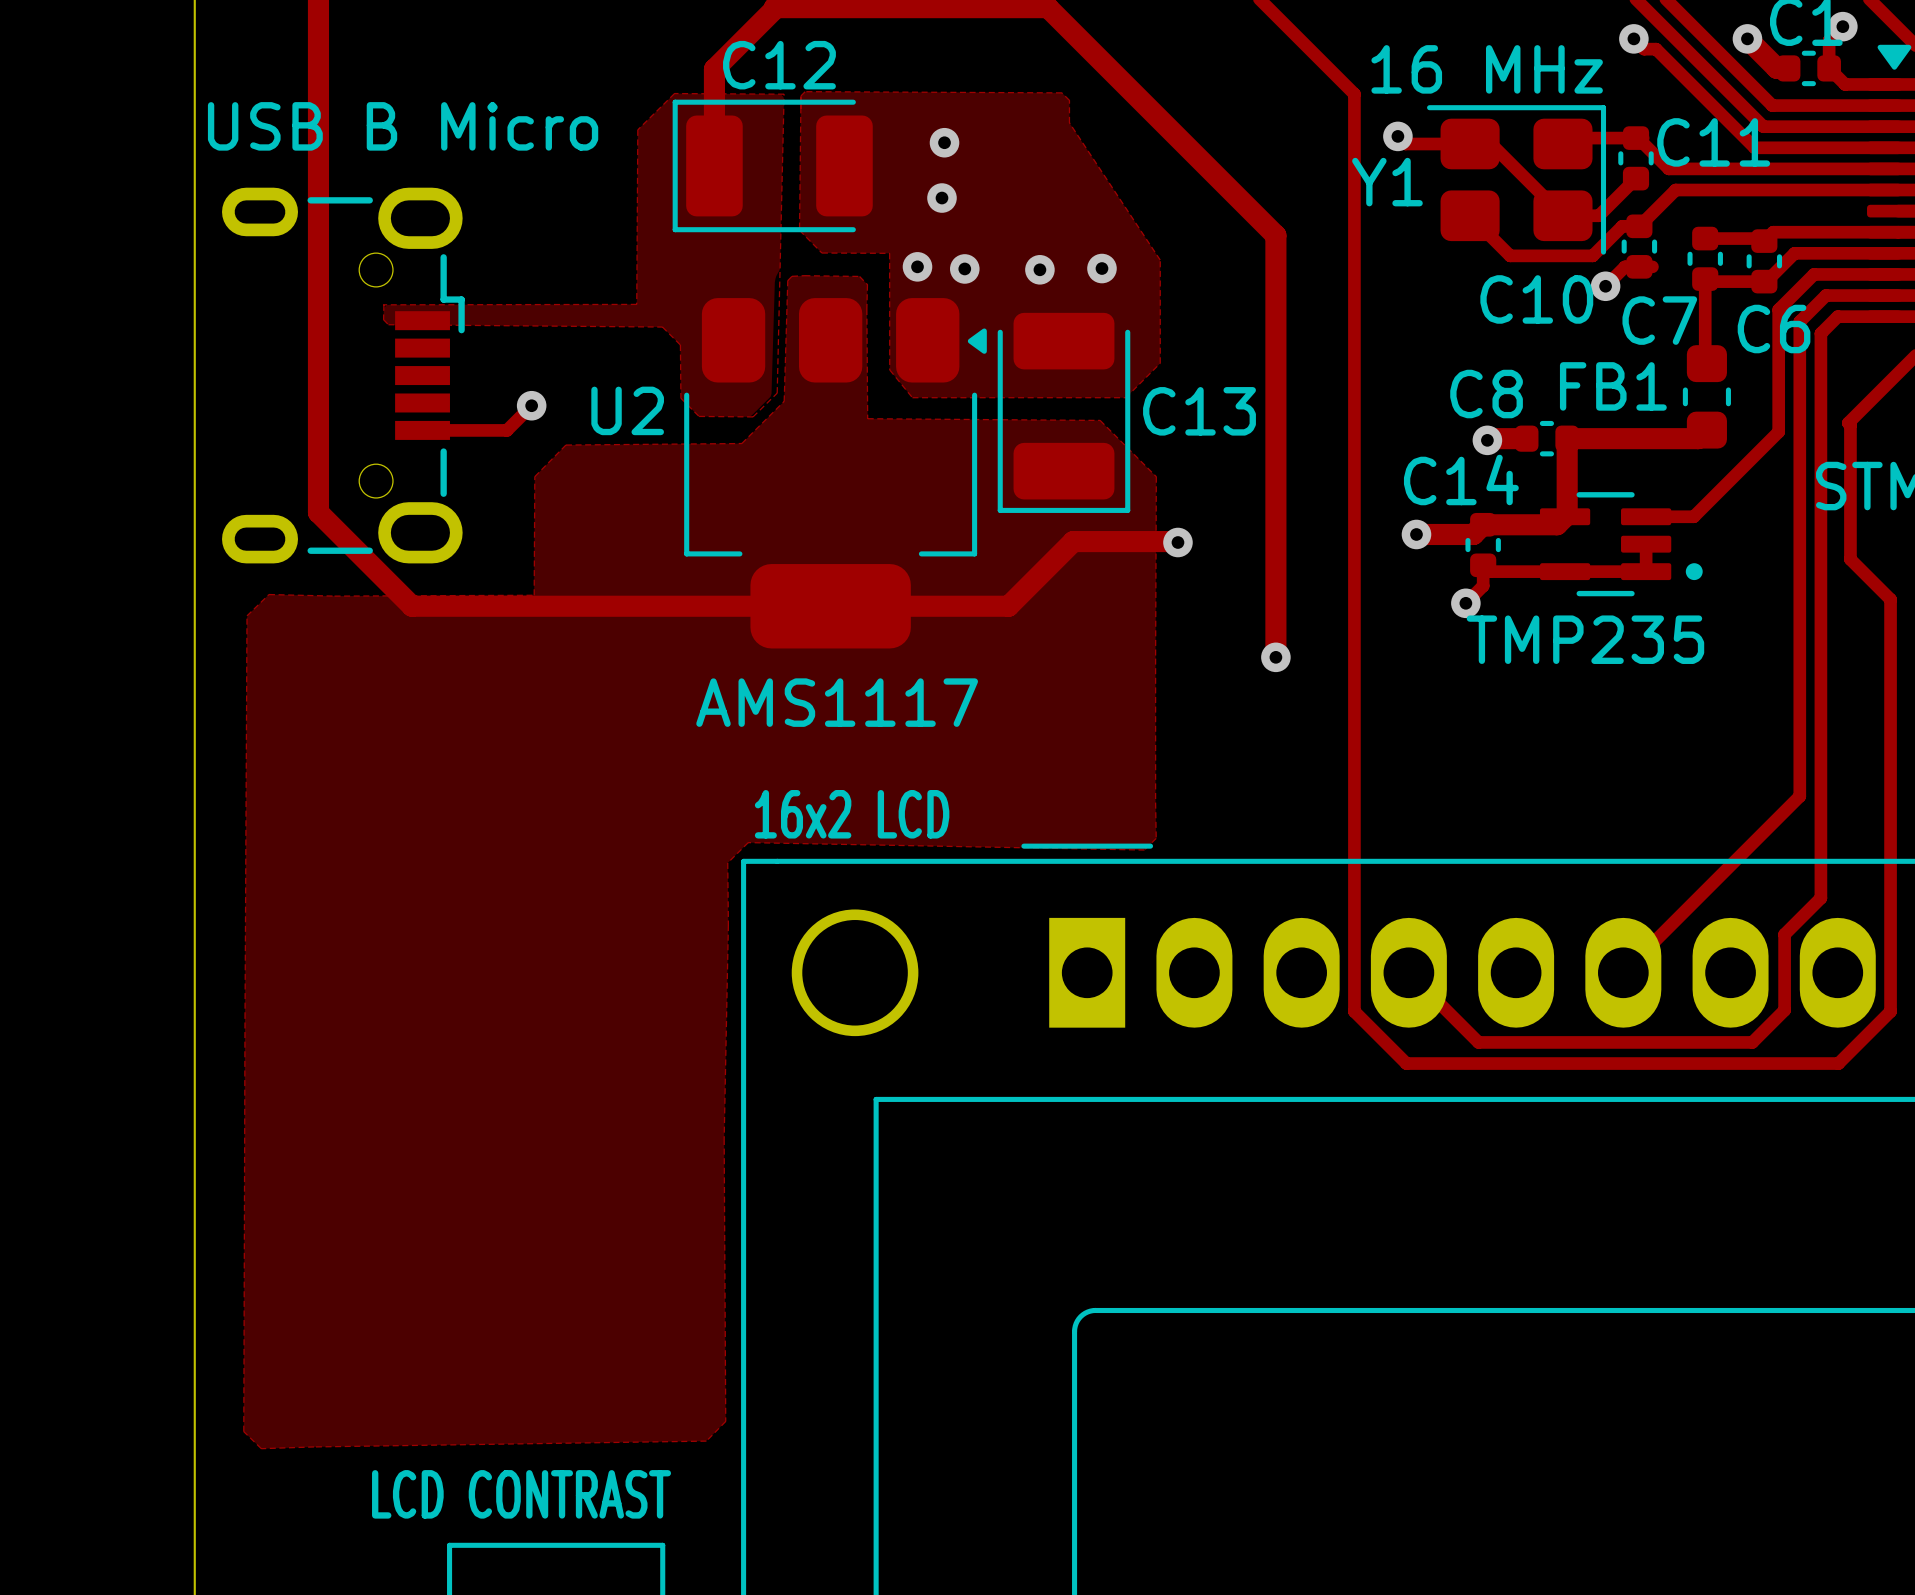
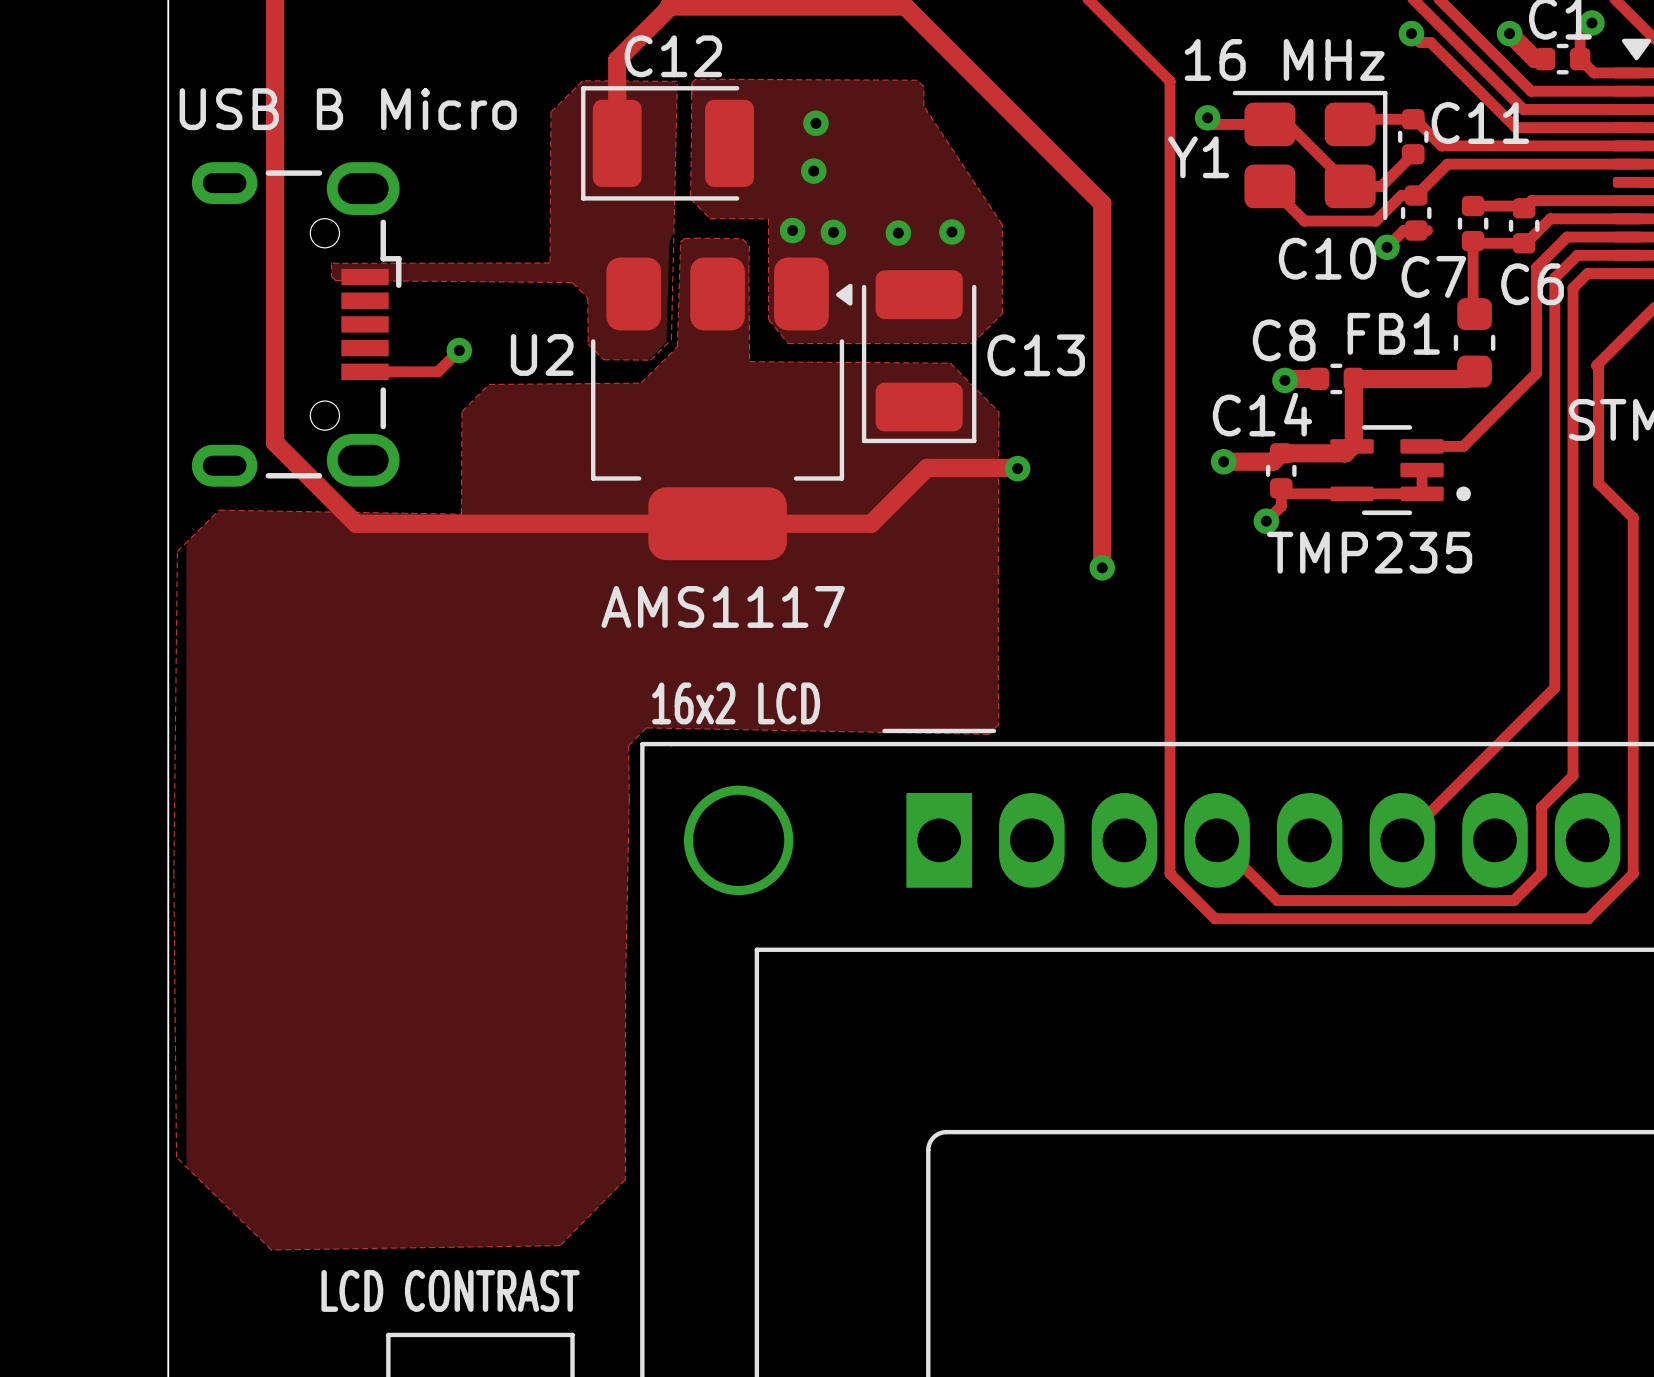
zone outline: (534, 595) (268, 594) (247, 615) (243, 1431) (261, 1448) (314, 1446) -> (461, 514) (219, 510) (177, 551) (173, 875) (176, 1157) (271, 1249)
zone outline: (724, 1139) (725, 1421) (706, 1441) (648, 1441) -> (625, 983) (625, 1179) (560, 1245)

